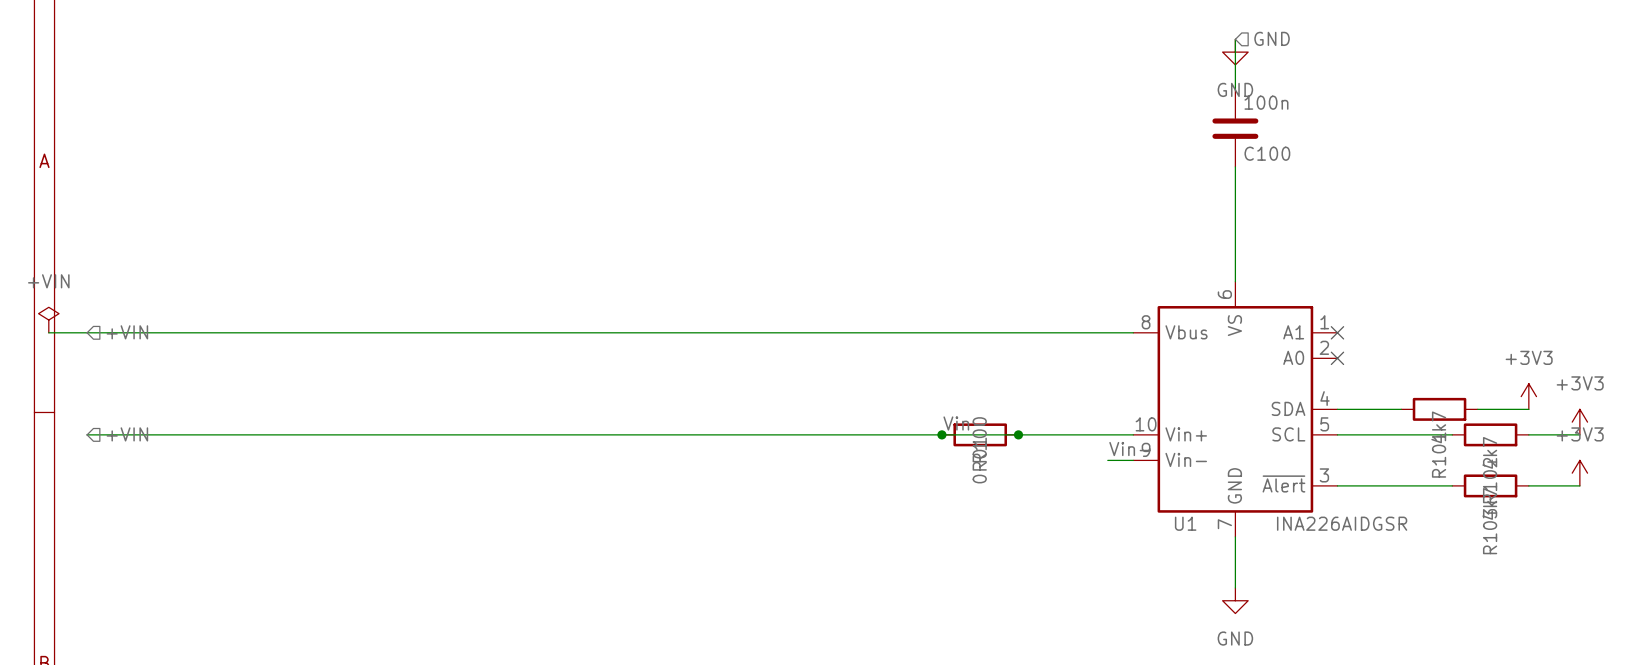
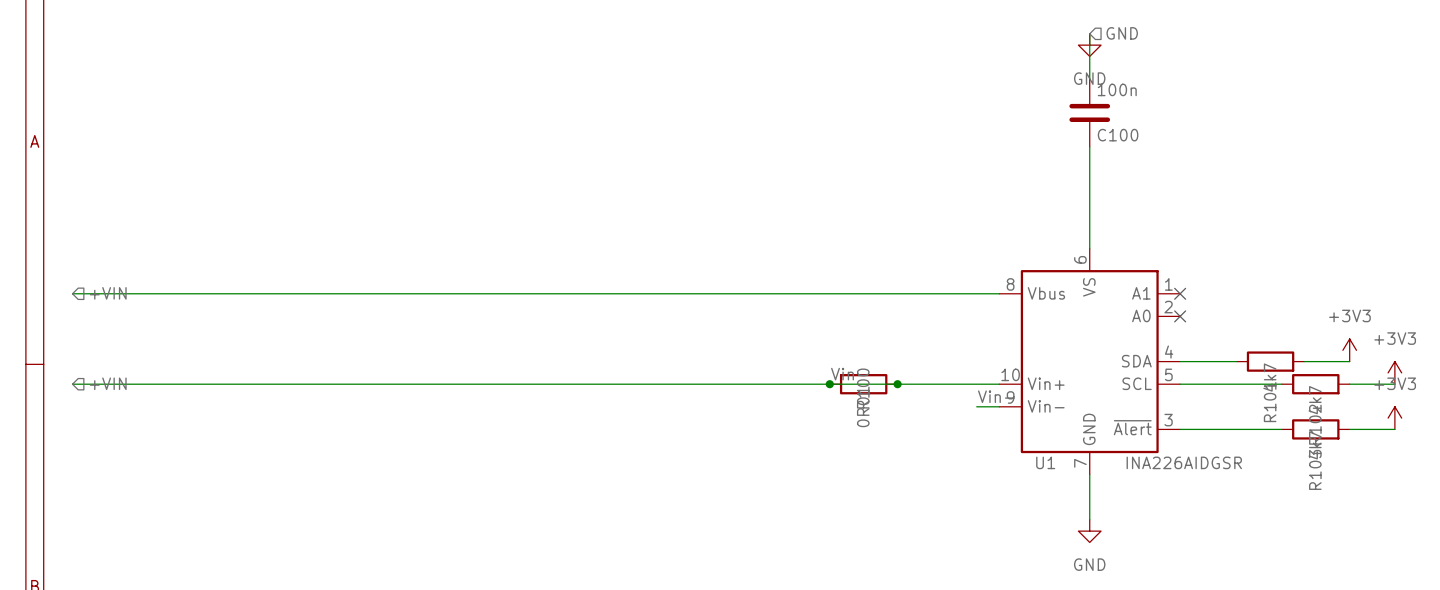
power symbol: +VIN (48, 320) -> none
wire: (48, 332) (87, 332) -> none

